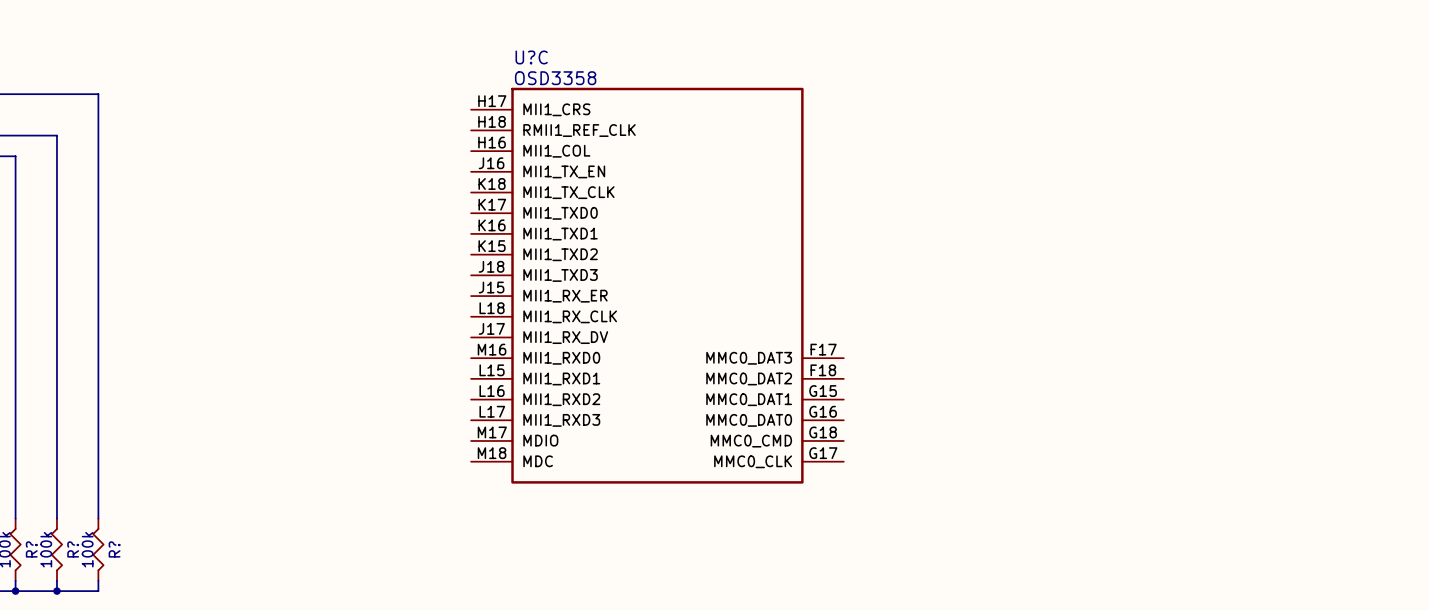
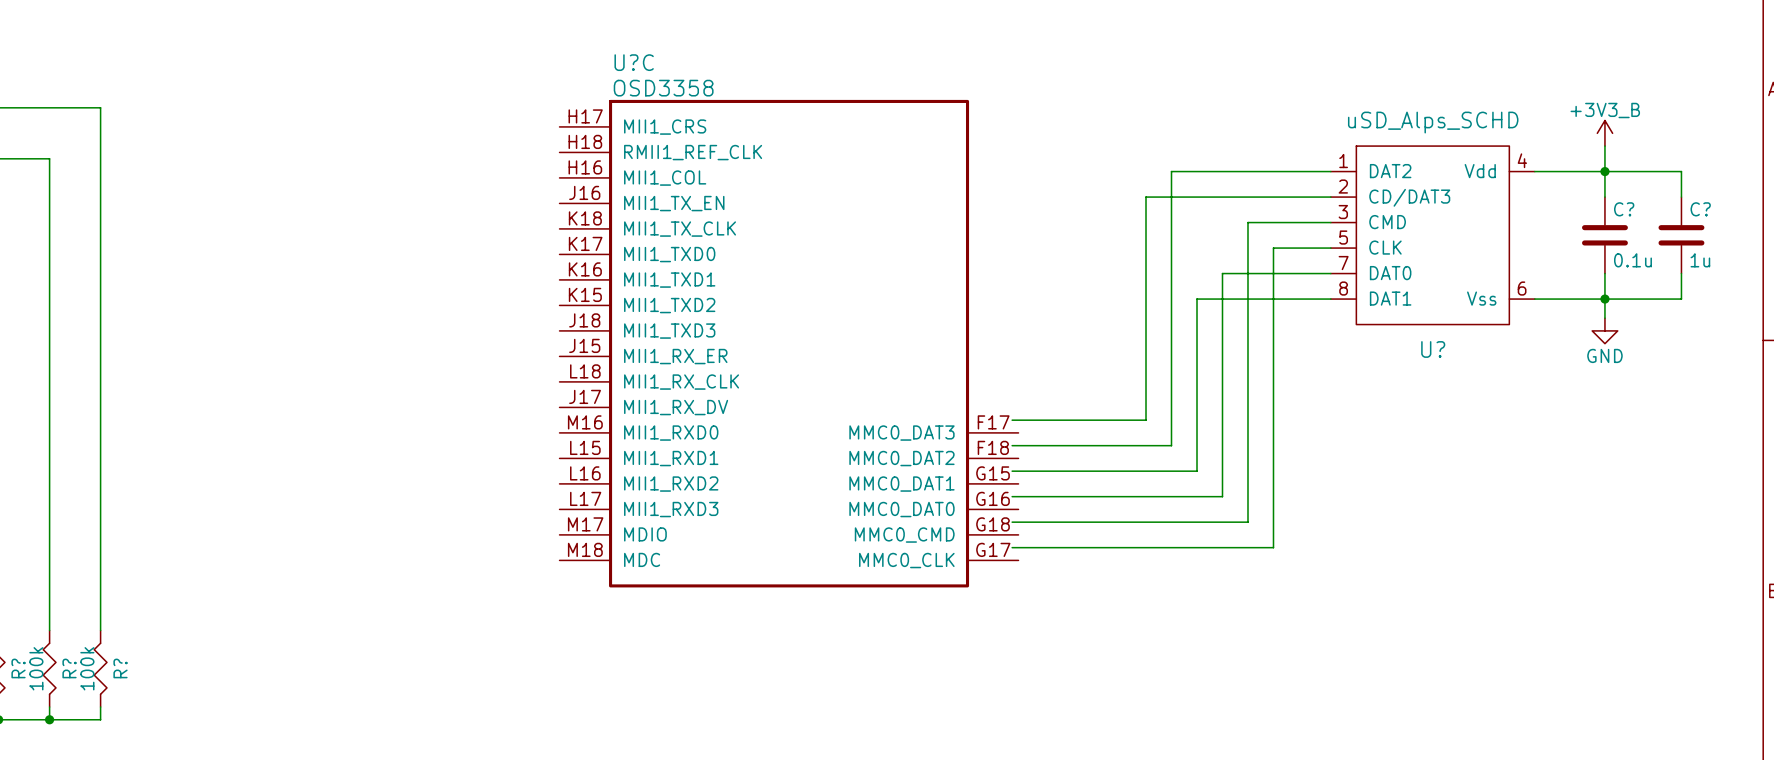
power symbol: none -> +3V3_B (1604, 133)
wire: none -> (1604, 146) (1604, 197)
wire: none -> (1330, 171) (1171, 171) (1171, 445) (1012, 445)
wire: none -> (1534, 171) (1681, 171) (1681, 197)
junction: none -> (1604, 171)
wire: none -> (1330, 197) (1146, 197) (1146, 420) (1012, 420)
wire: none -> (1330, 222) (1247, 222) (1247, 522) (1012, 522)
U?: none -> uSD_Alps_SCHD (1432, 235)
C?: none -> 0.1u (1604, 235)
C?: none -> 1u (1681, 235)
wire: none -> (1330, 248) (1273, 248) (1273, 547) (1012, 547)
wire: none -> (1330, 273) (1222, 273) (1222, 496) (1012, 496)
wire: none -> (1604, 273) (1604, 318)
wire: none -> (1681, 273) (1681, 299) (1534, 299)
wire: none -> (1330, 299) (1197, 299) (1197, 471) (1012, 471)
junction: none -> (1604, 299)
power symbol: none -> GND (1604, 330)

